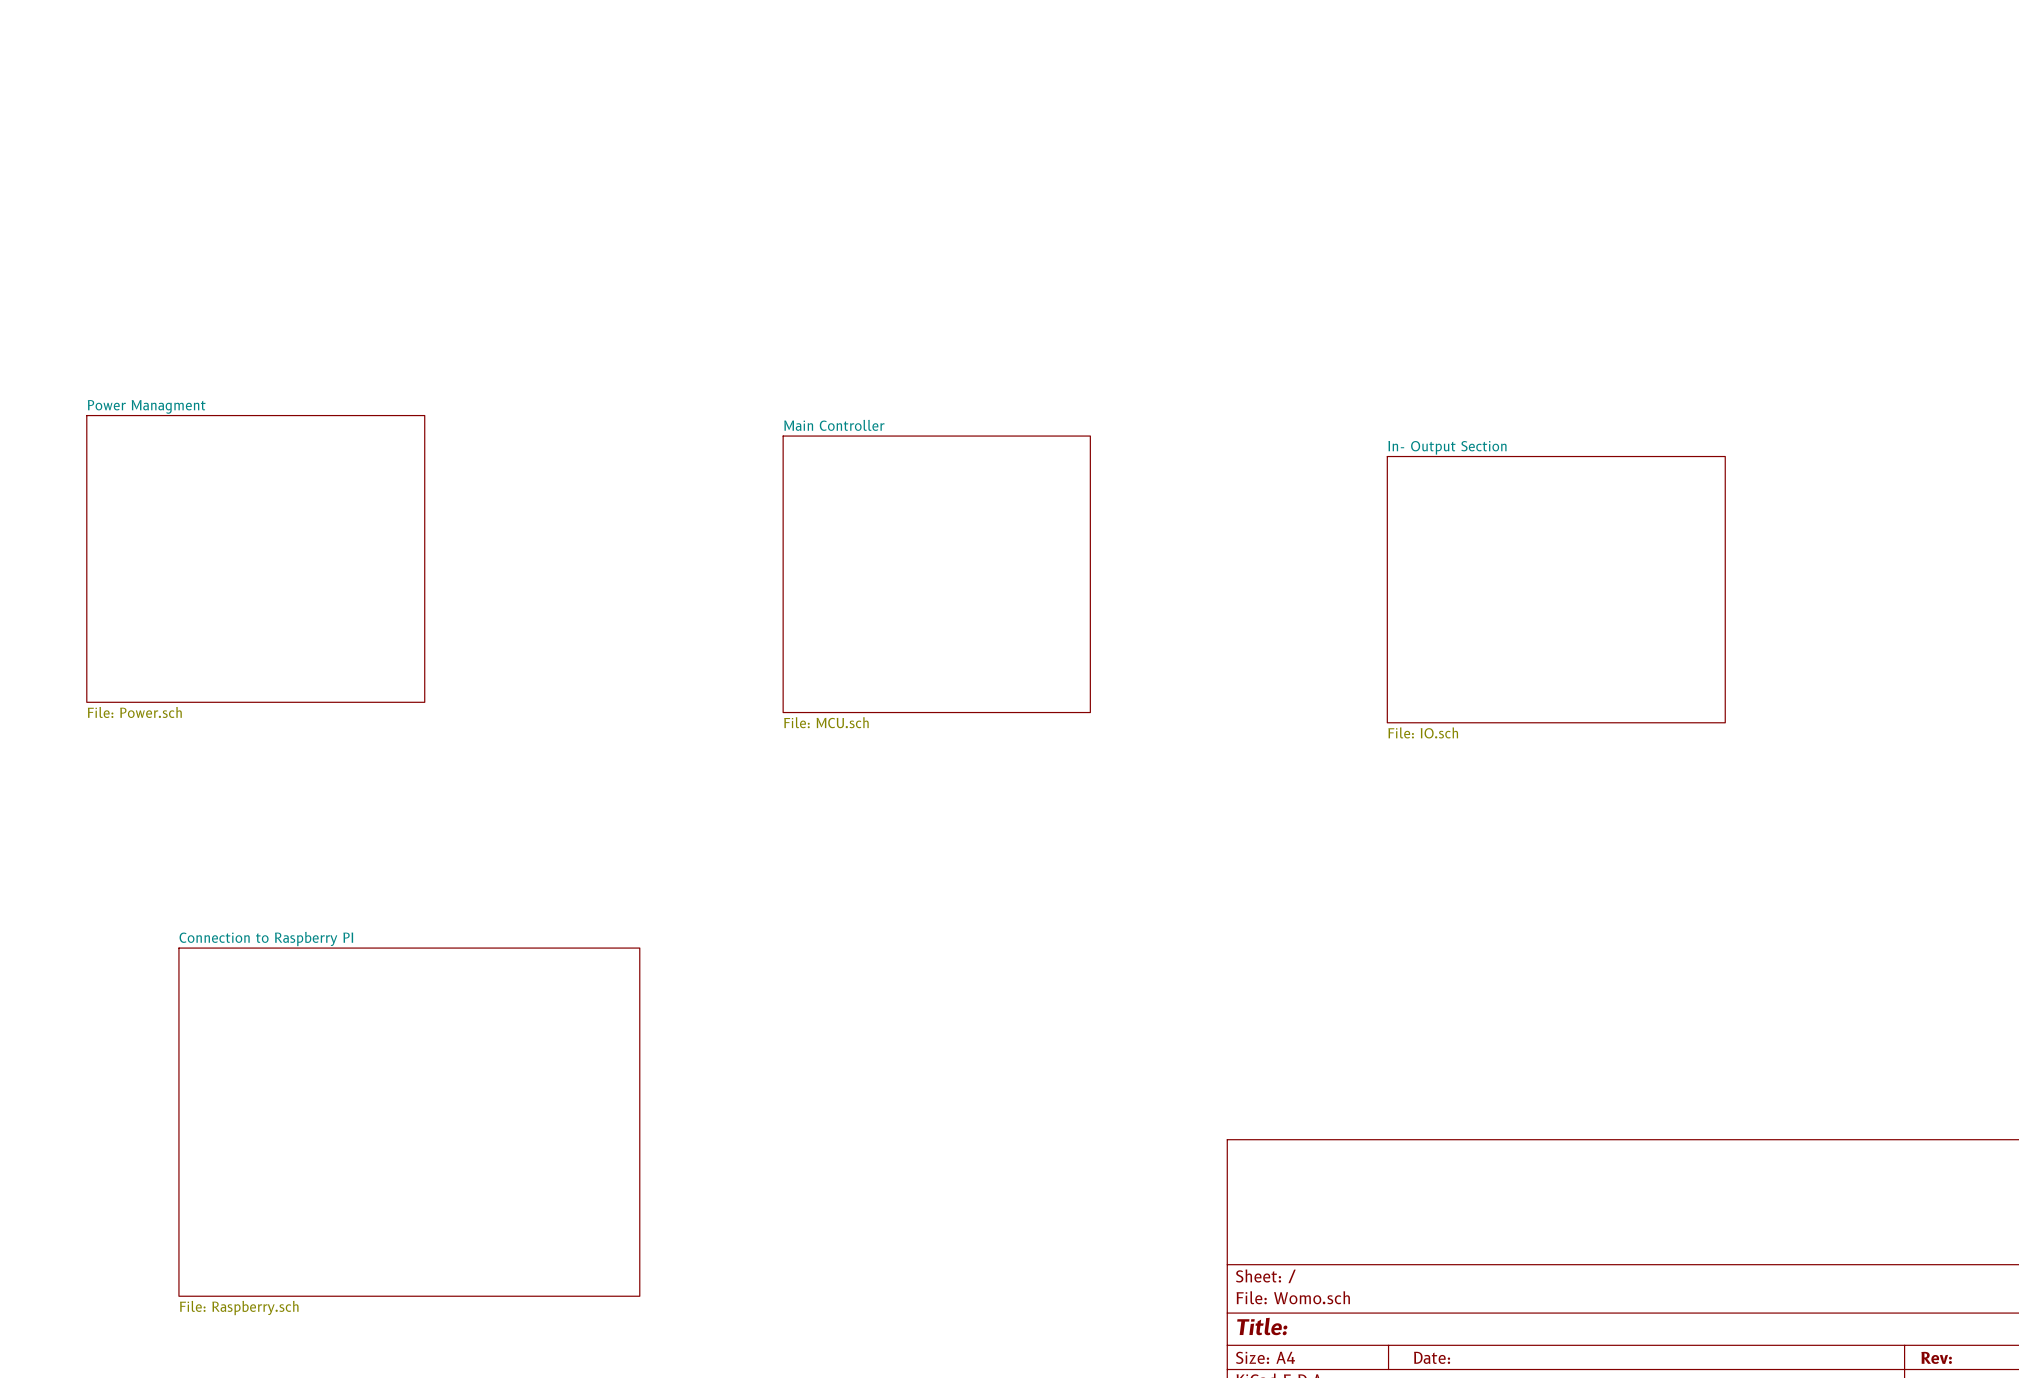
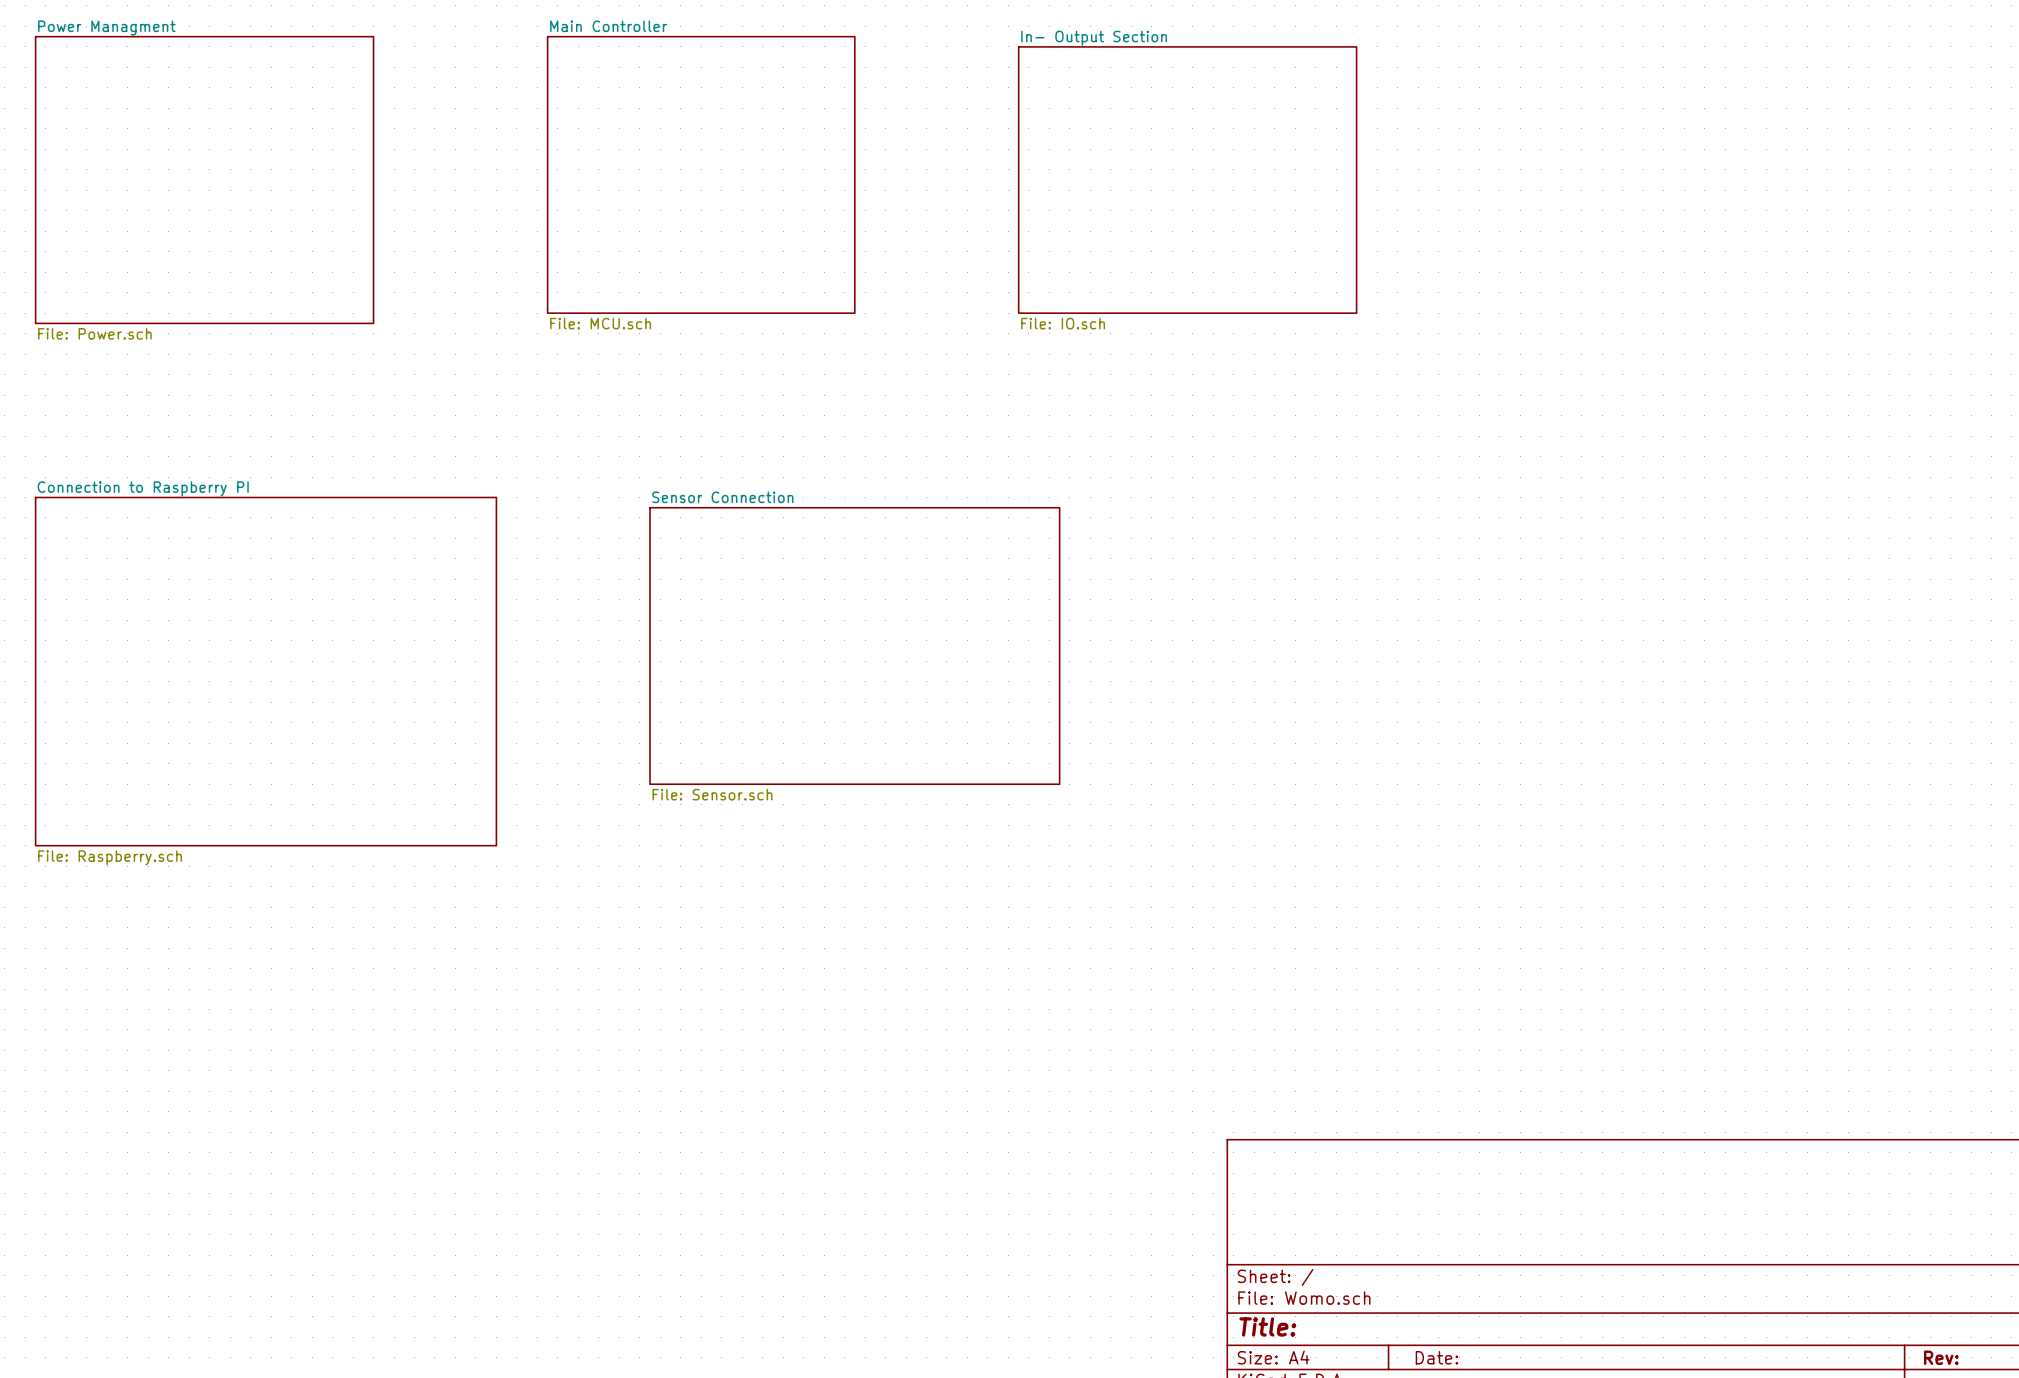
sheet Main Controller: none -> File: MCU.sch (701, 174)
sheet Power Managment: none -> File: Power.sch (204, 180)
sheet In- Output Section: none -> File: IO.sch (1187, 180)
sheet Power Managment: File: Power.sch (255, 558) -> none
sheet Main Controller: File: MCU.sch (936, 574) -> none
sheet In- Output Section: File: IO.sch (1556, 589) -> none
sheet Sensor Connection: none -> File: Sensor.sch (854, 645)
sheet Connection to Raspberry PI: none -> File: Raspberry.sch (266, 671)
sheet Connection to Raspberry PI: File: Raspberry.sch (409, 1122) -> none

